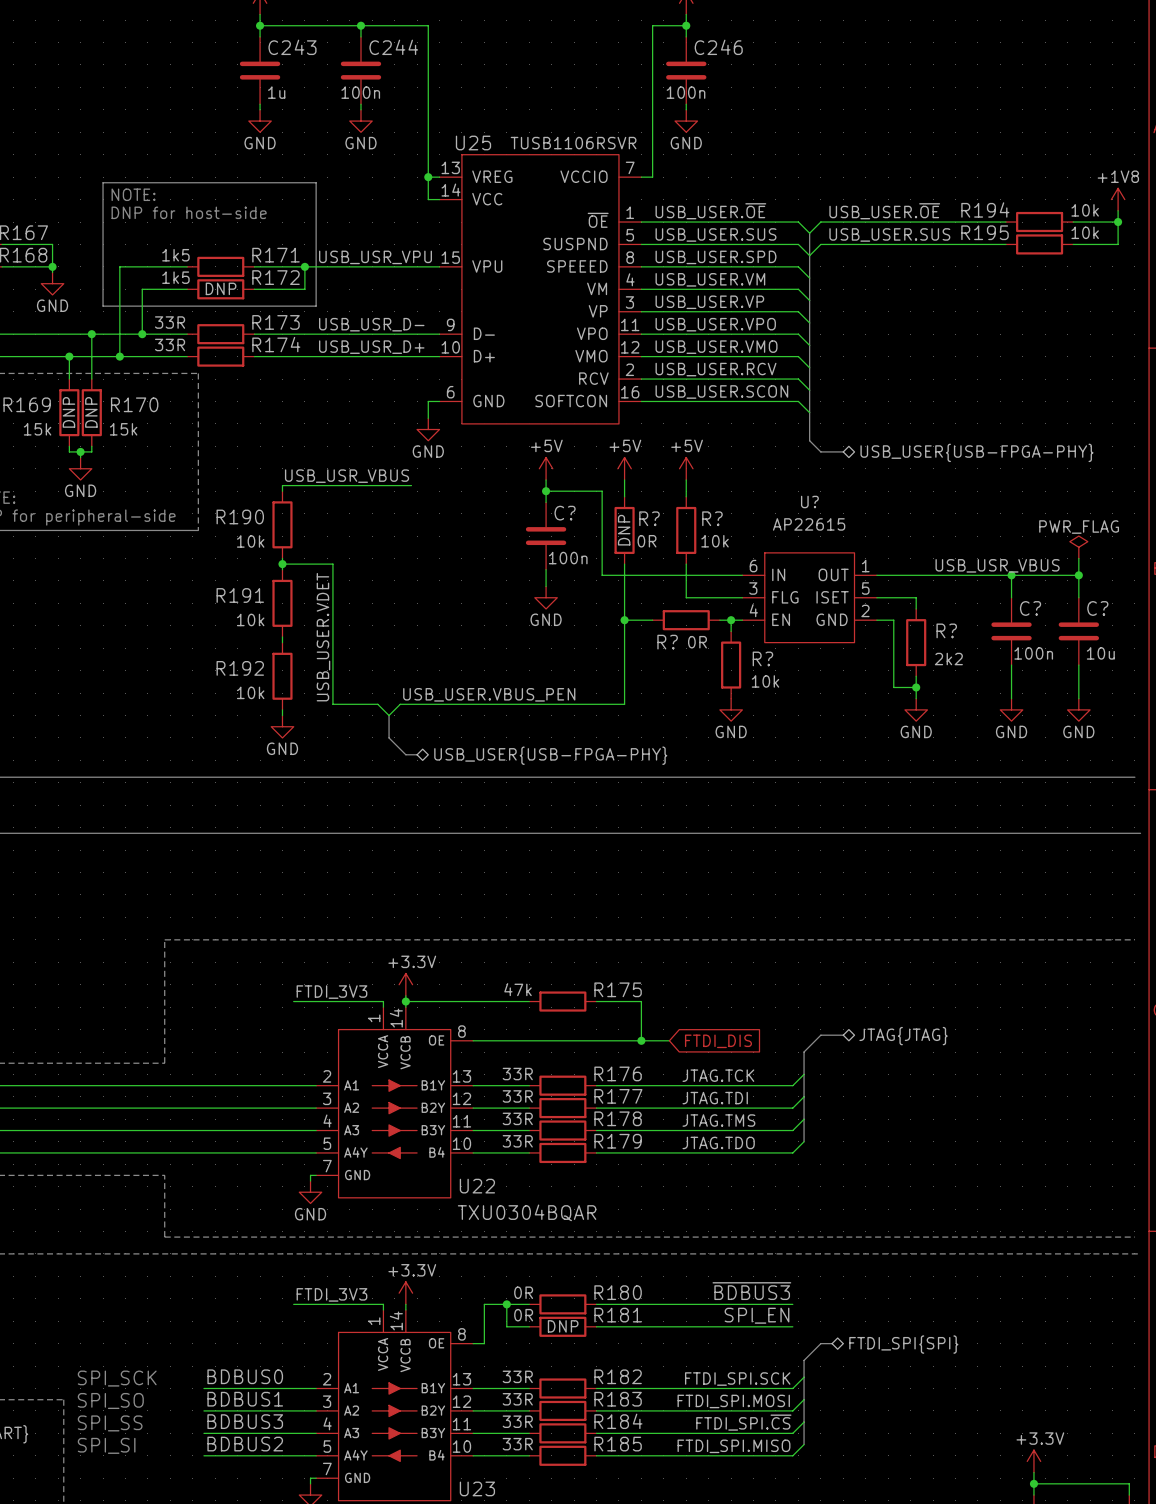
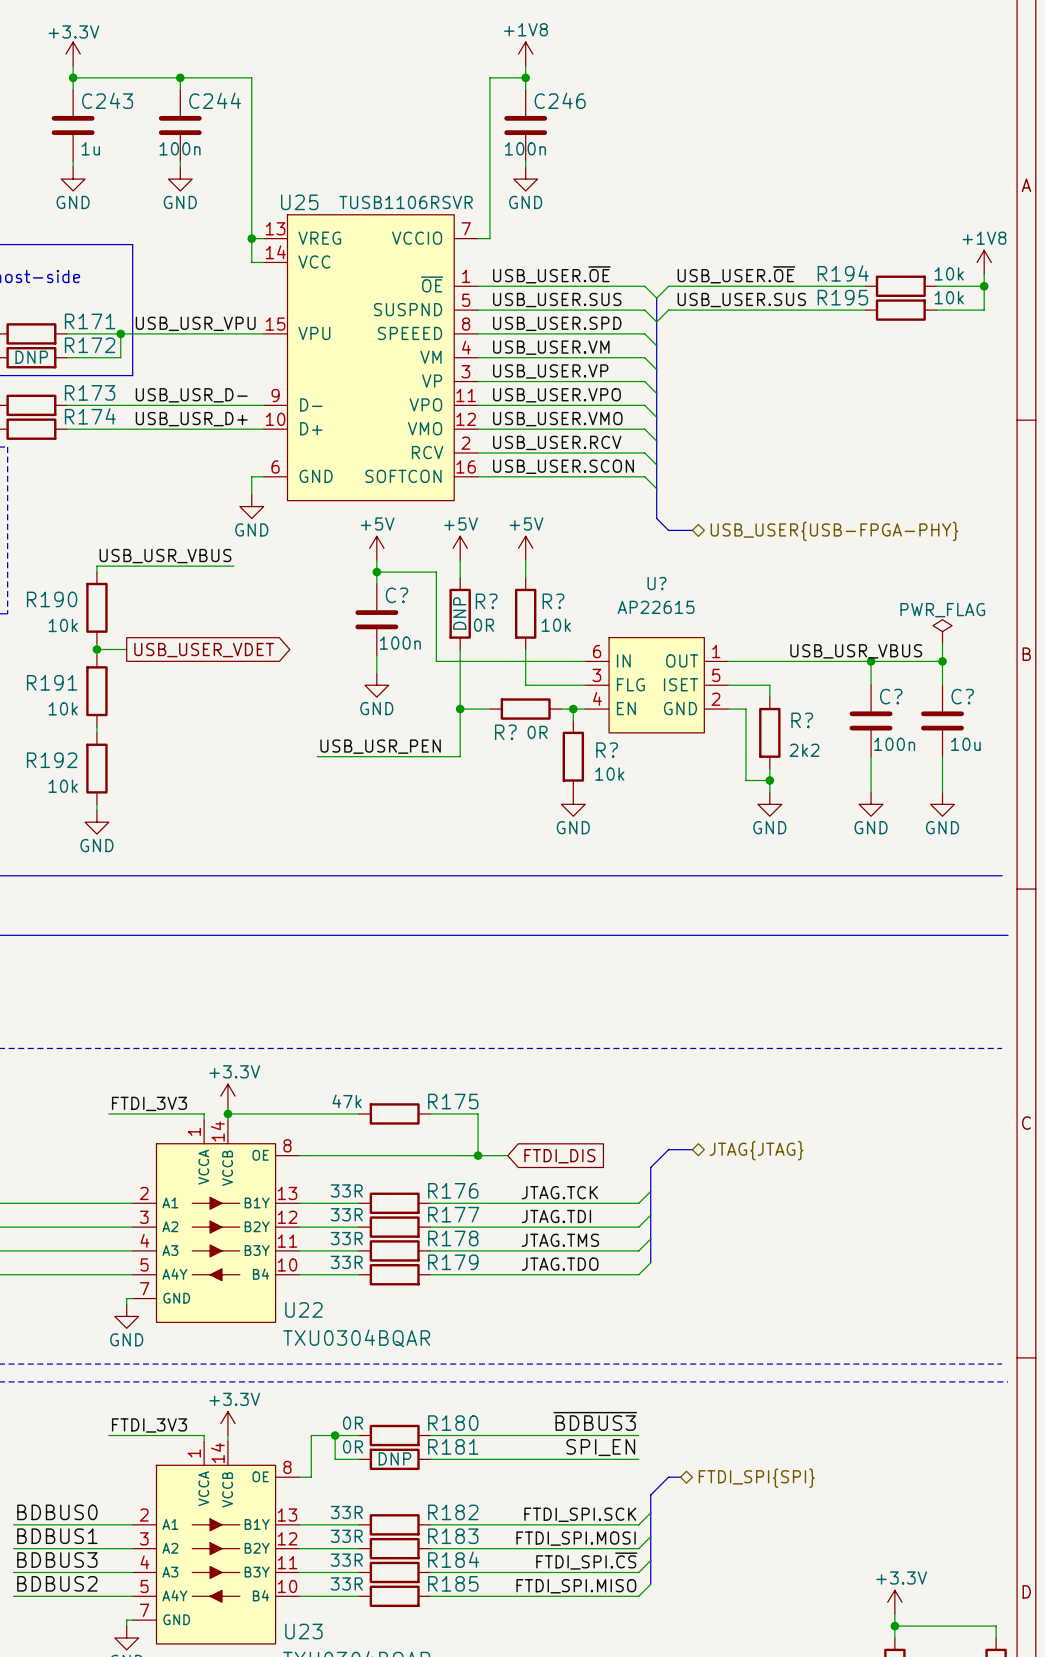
wire: (310, 564) (332, 564) (332, 704) (377, 704) (389, 715) (400, 704) (624, 704) (624, 665) -> (317, 756) (460, 756)
global label: none -> USB_USER_VDET (204, 650)
label: USB_USER.VDET (323, 637) -> none
label: none -> USB_USR_PEN (380, 746)
label: USB_USER.VBUS_PEN (489, 694) -> none
bus: (389, 715) (389, 737) (405, 754) (417, 754) -> none
hierarchical label: USB_USER{USB-FPGA-PHY} (550, 755) -> none

